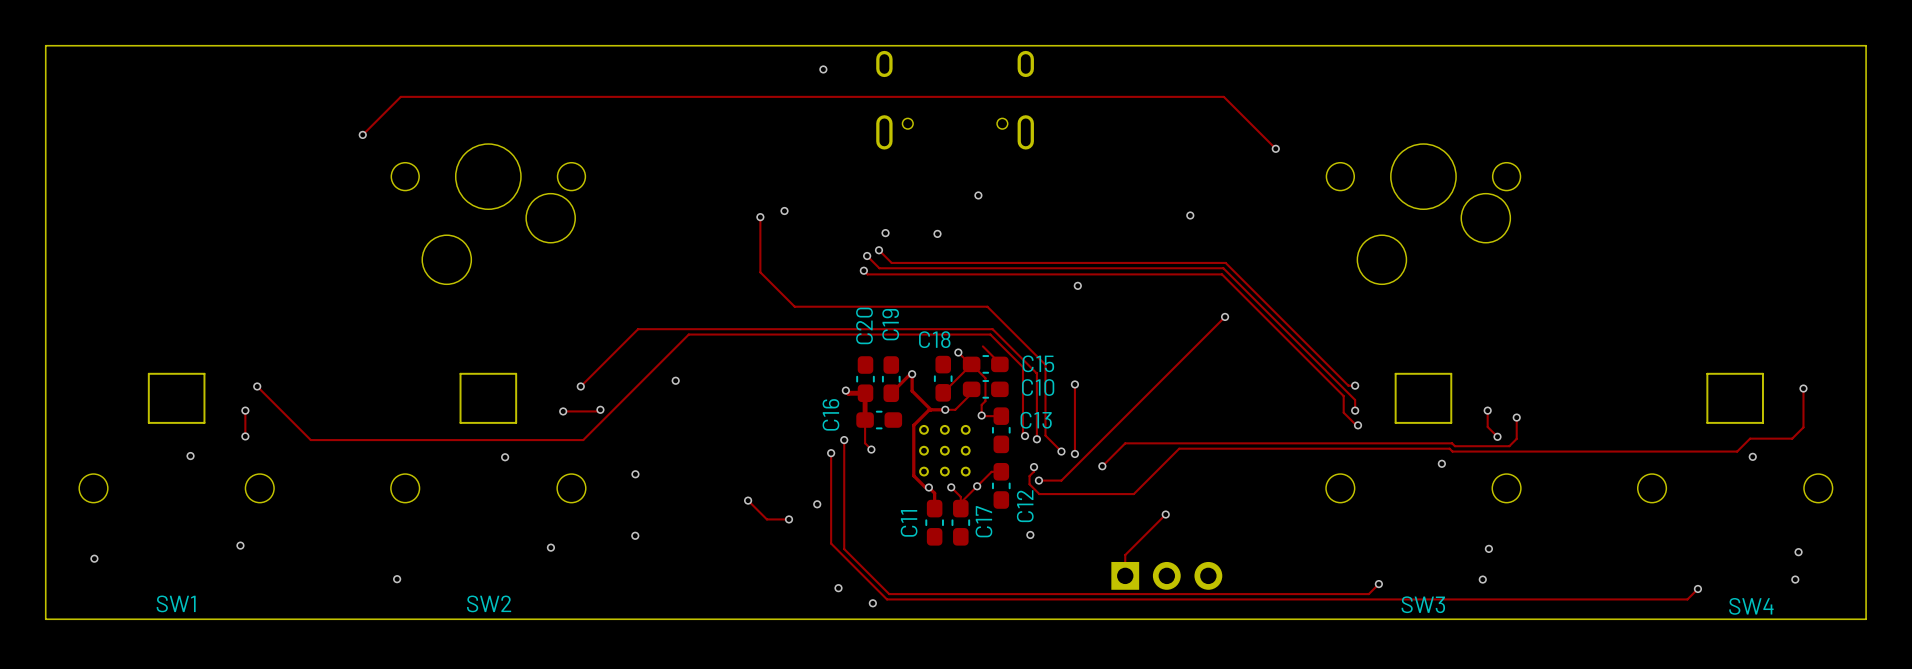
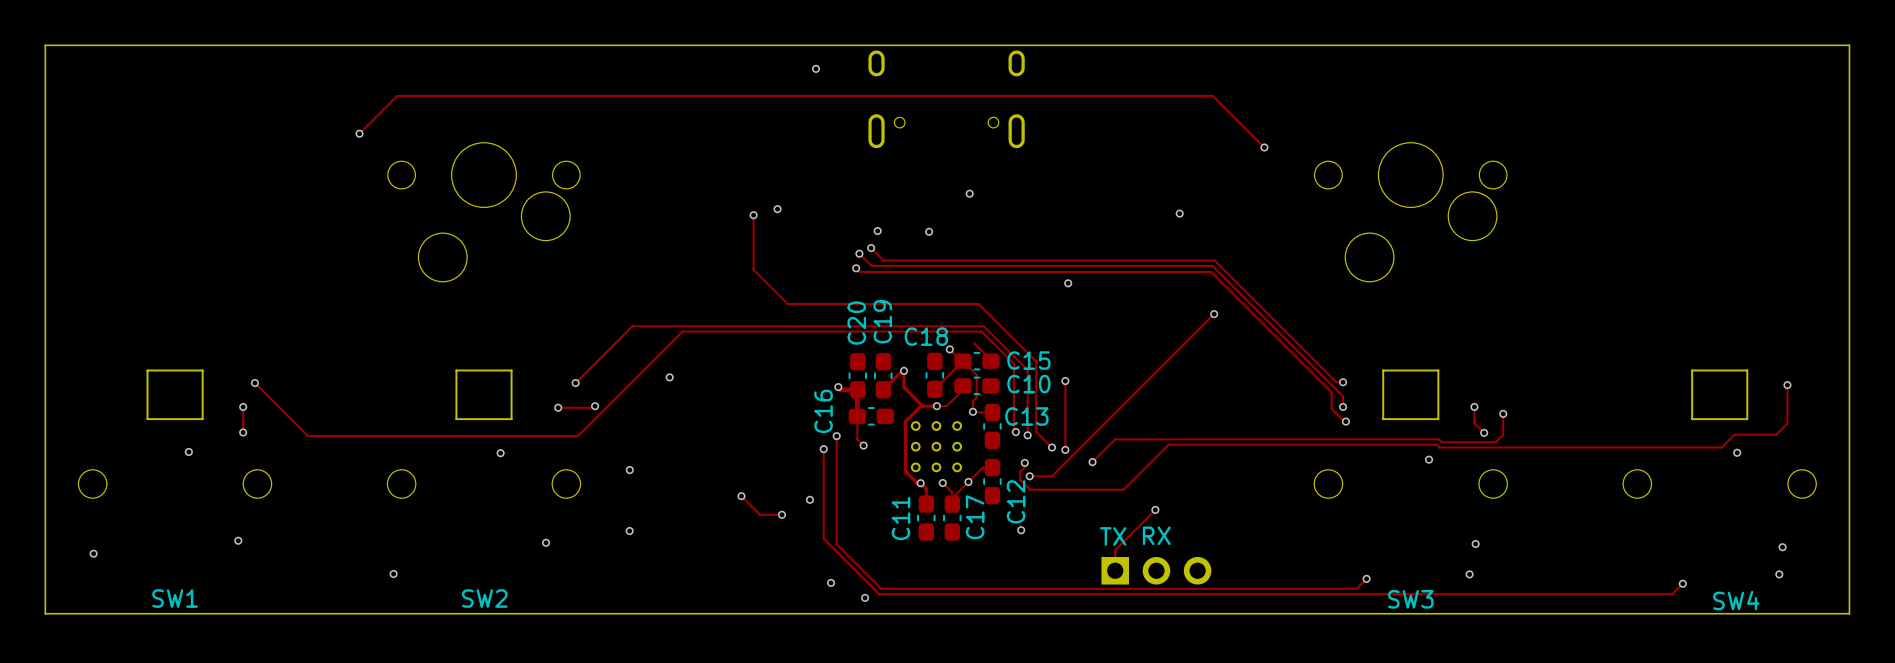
text: none -> RX (1156, 535)
text: none -> TX (1113, 536)

